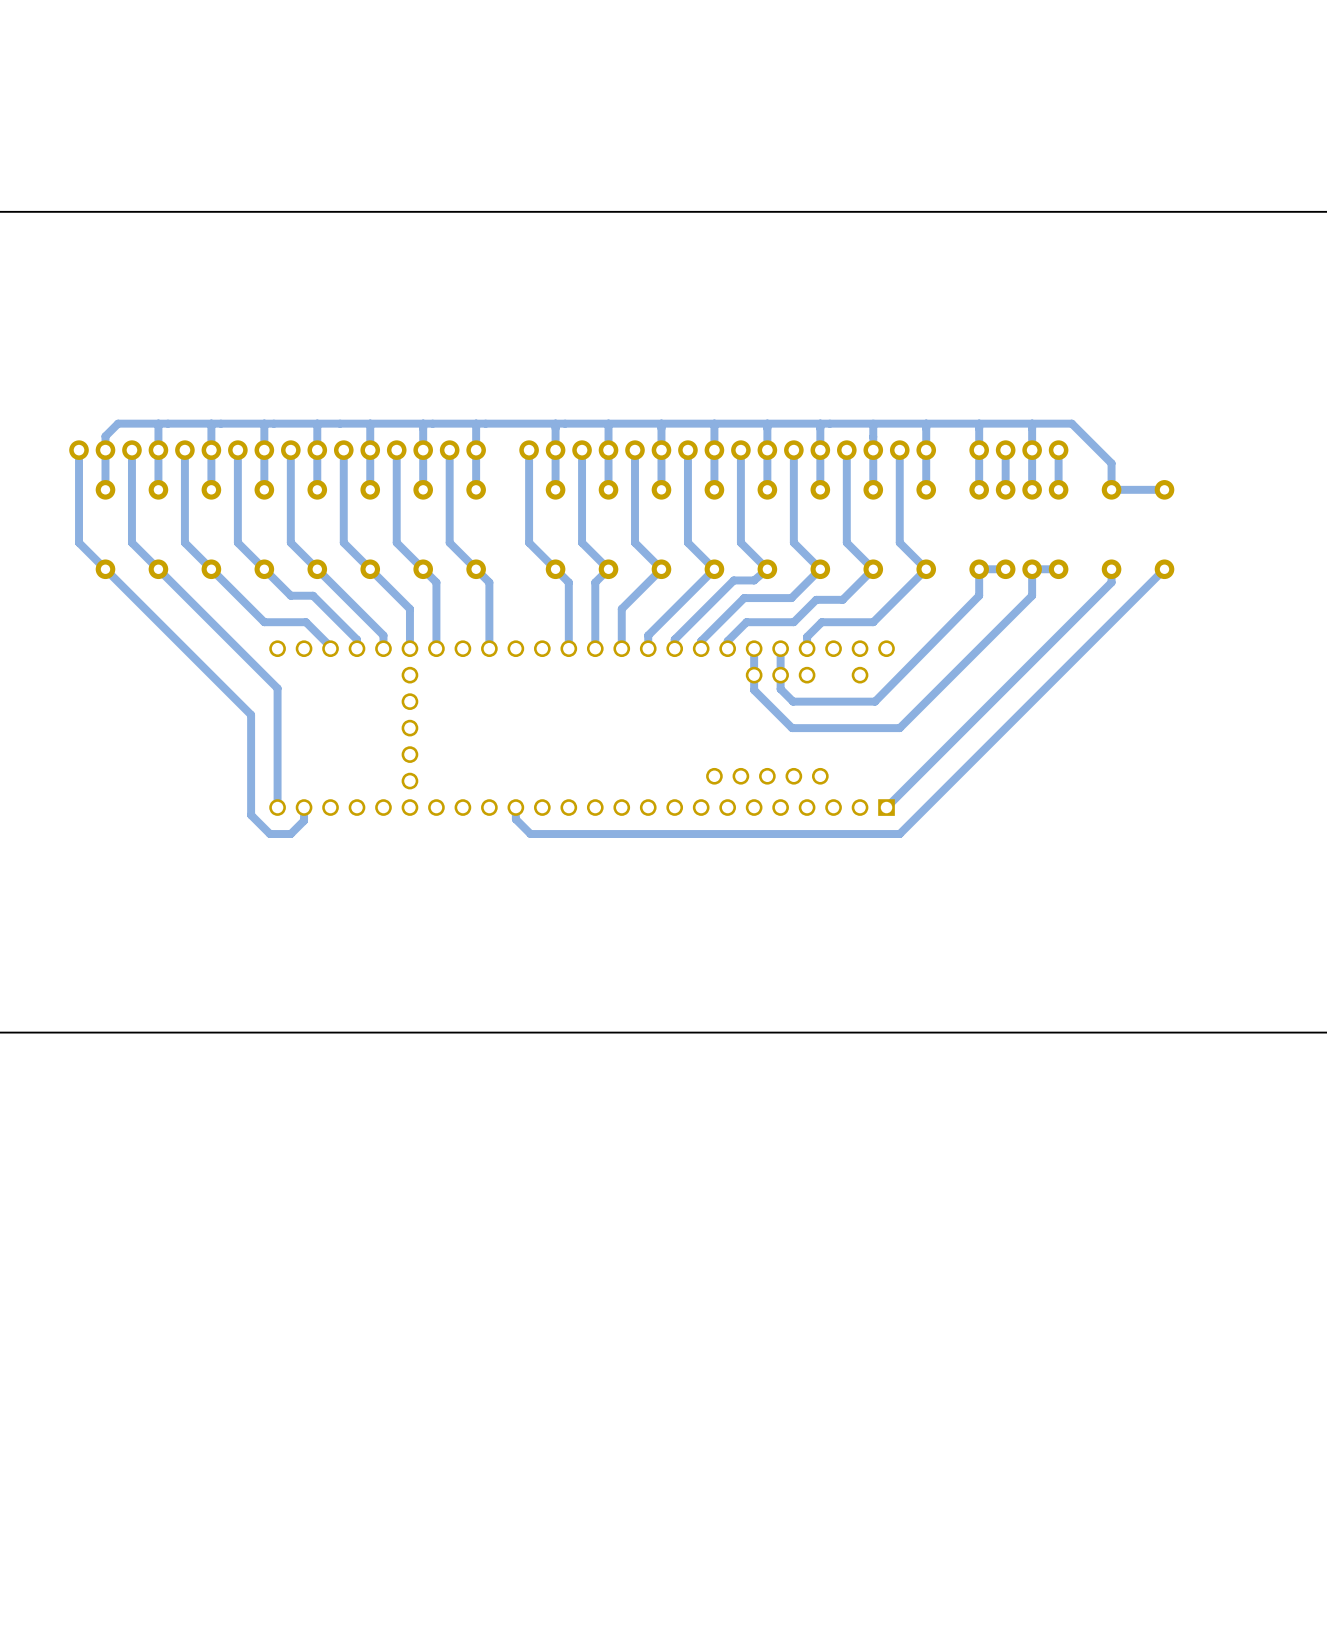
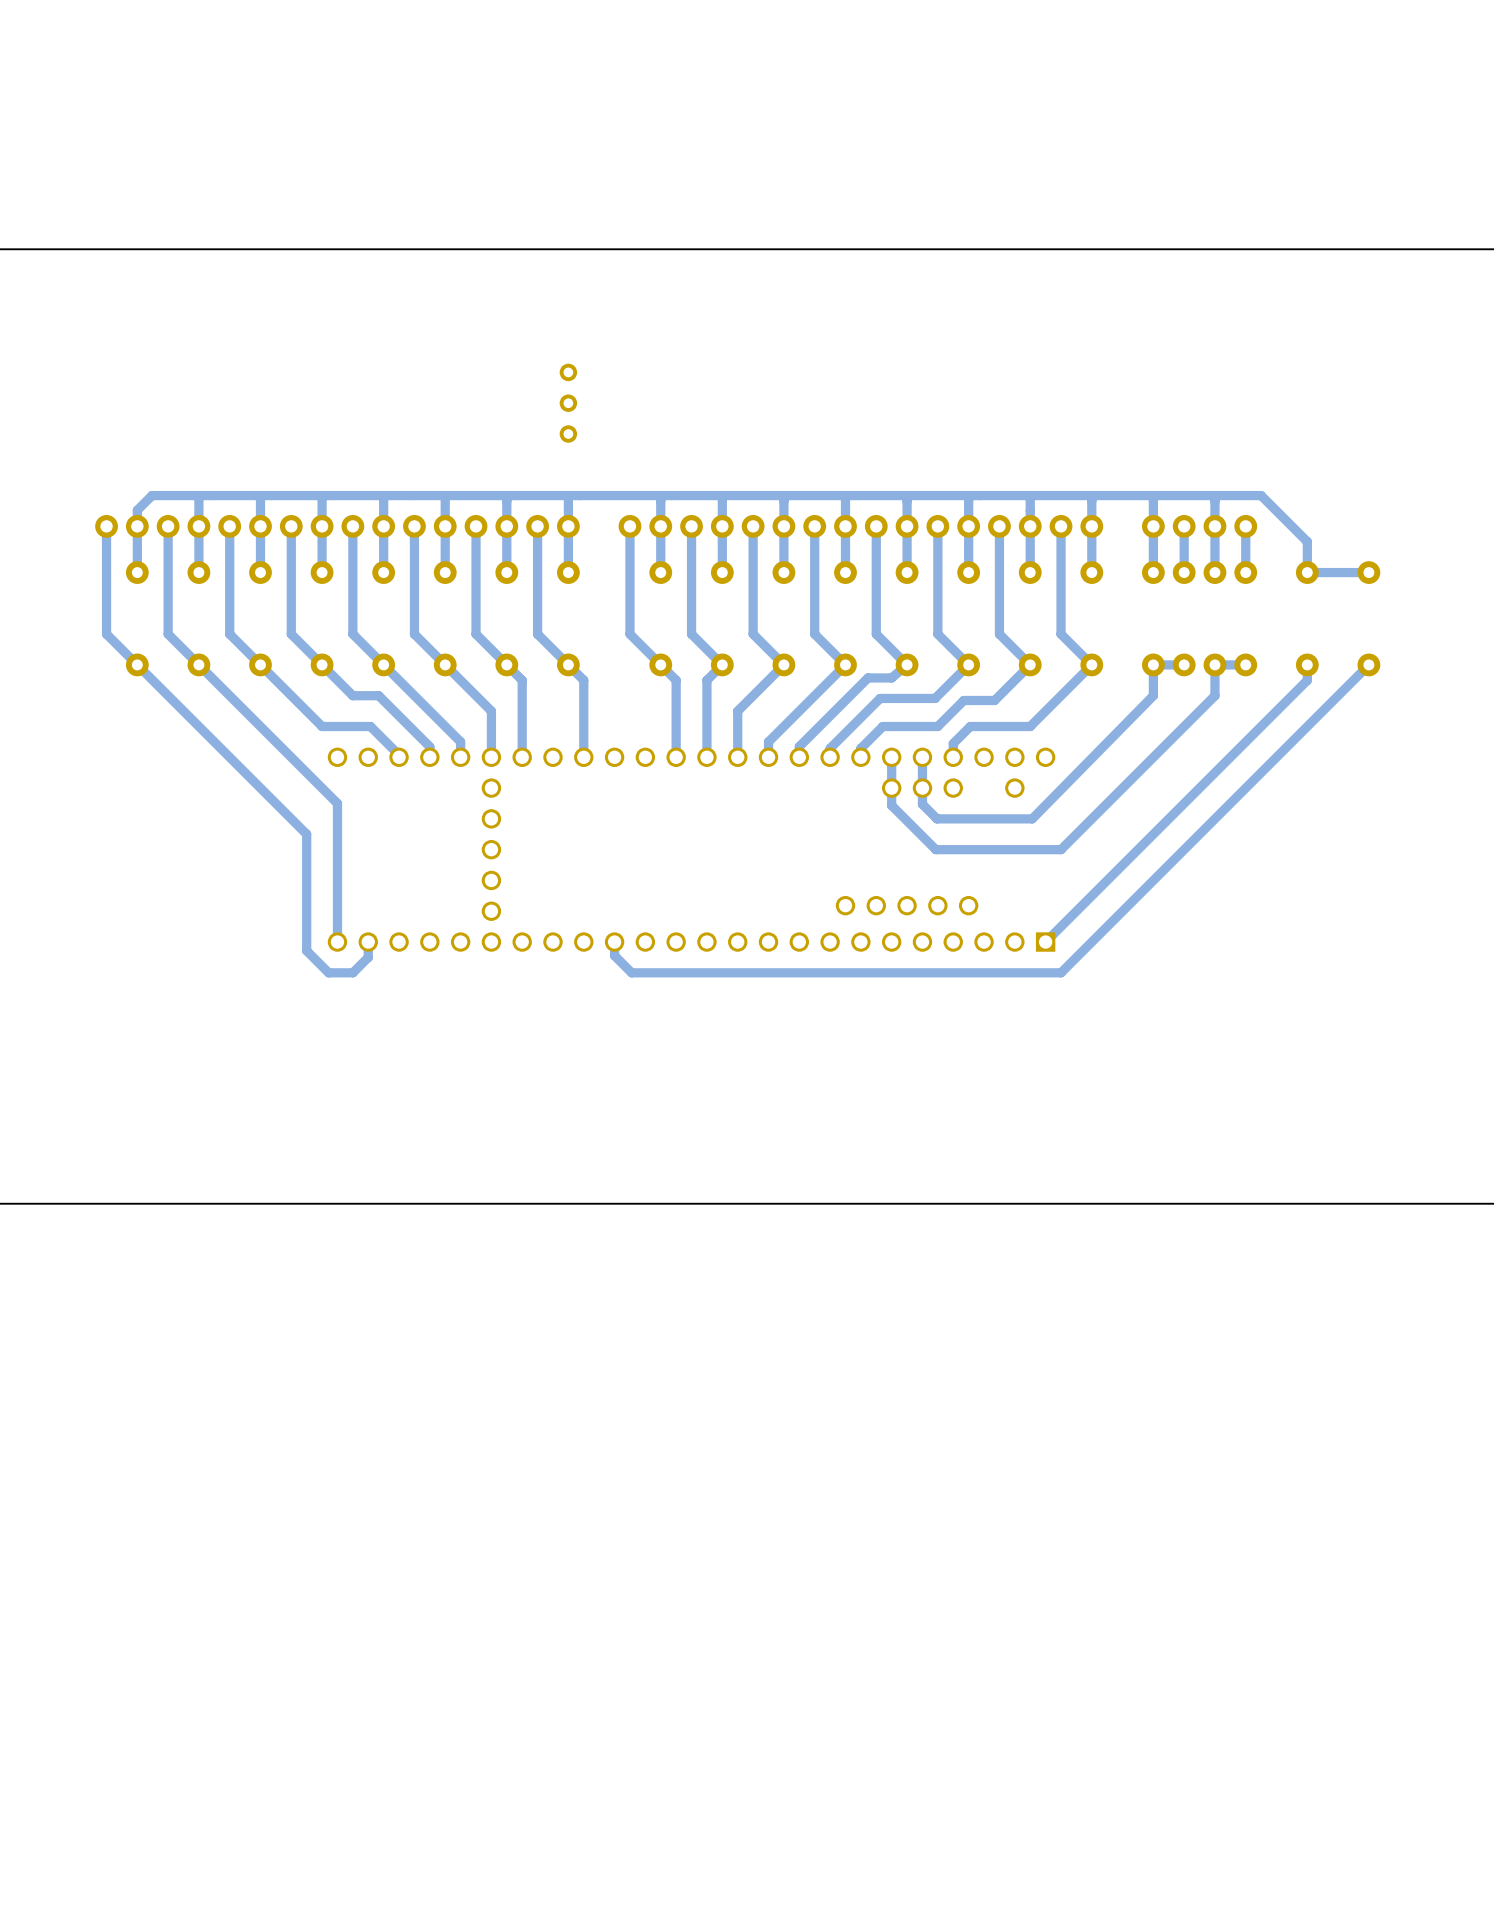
part: none -> (568, 403)

